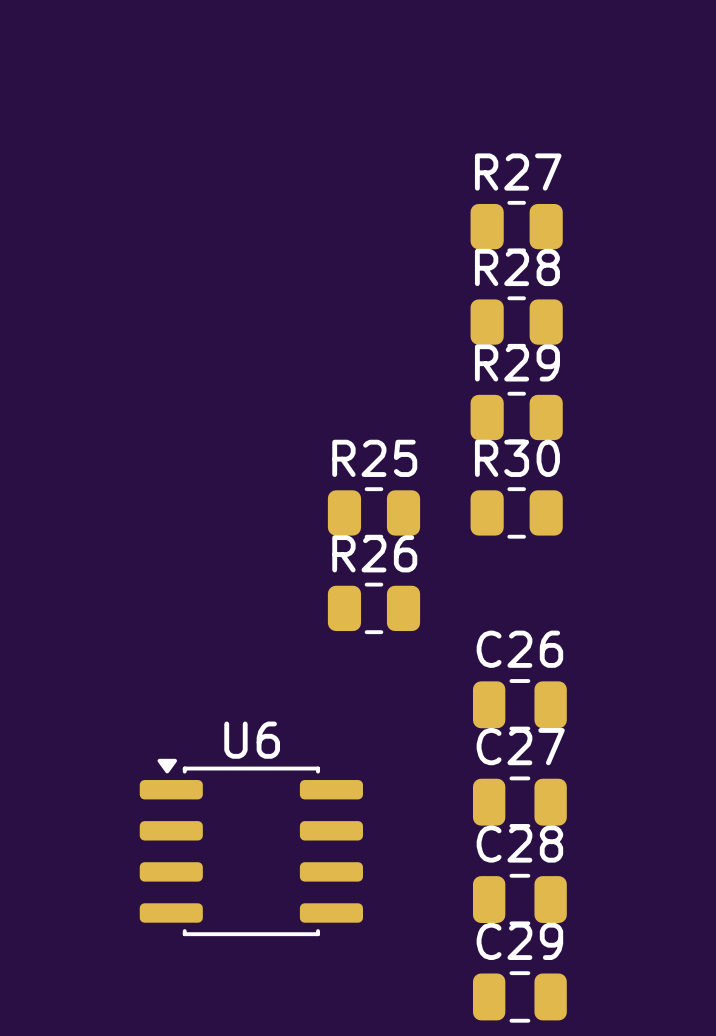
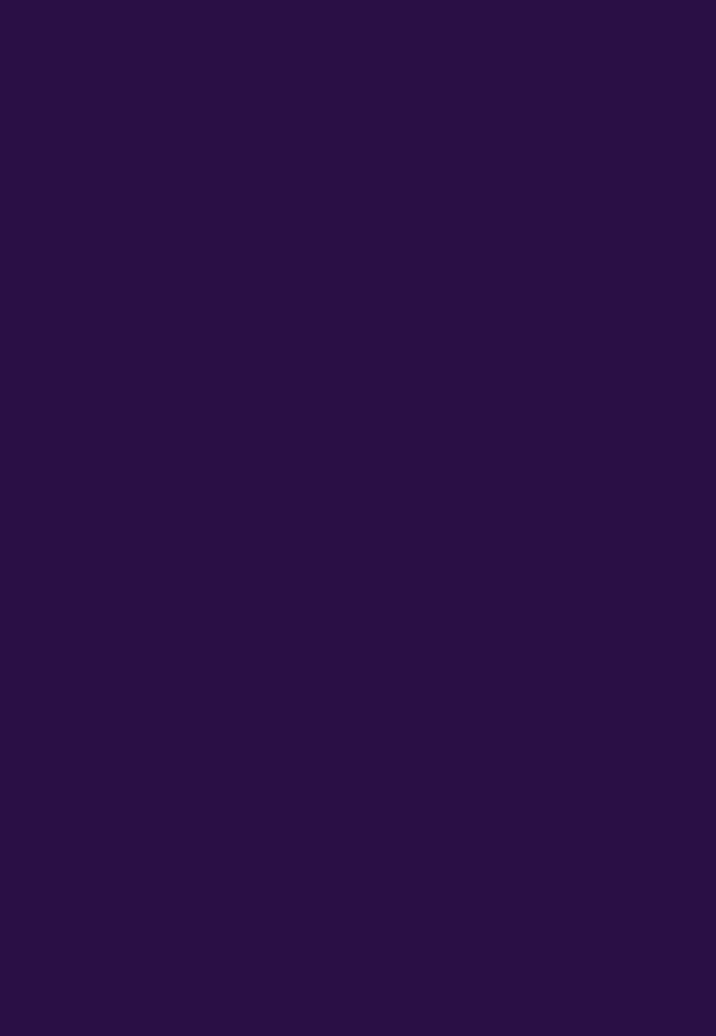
R27: (516, 226) -> none
R28: (516, 322) -> none
R29: (516, 417) -> none
R25: (373, 512) -> none
R30: (516, 512) -> none
R26: (373, 608) -> none
C26: (519, 704) -> none
C27: (519, 802) -> none
U6: (251, 847) -> none
C28: (519, 899) -> none
C29: (519, 996) -> none

